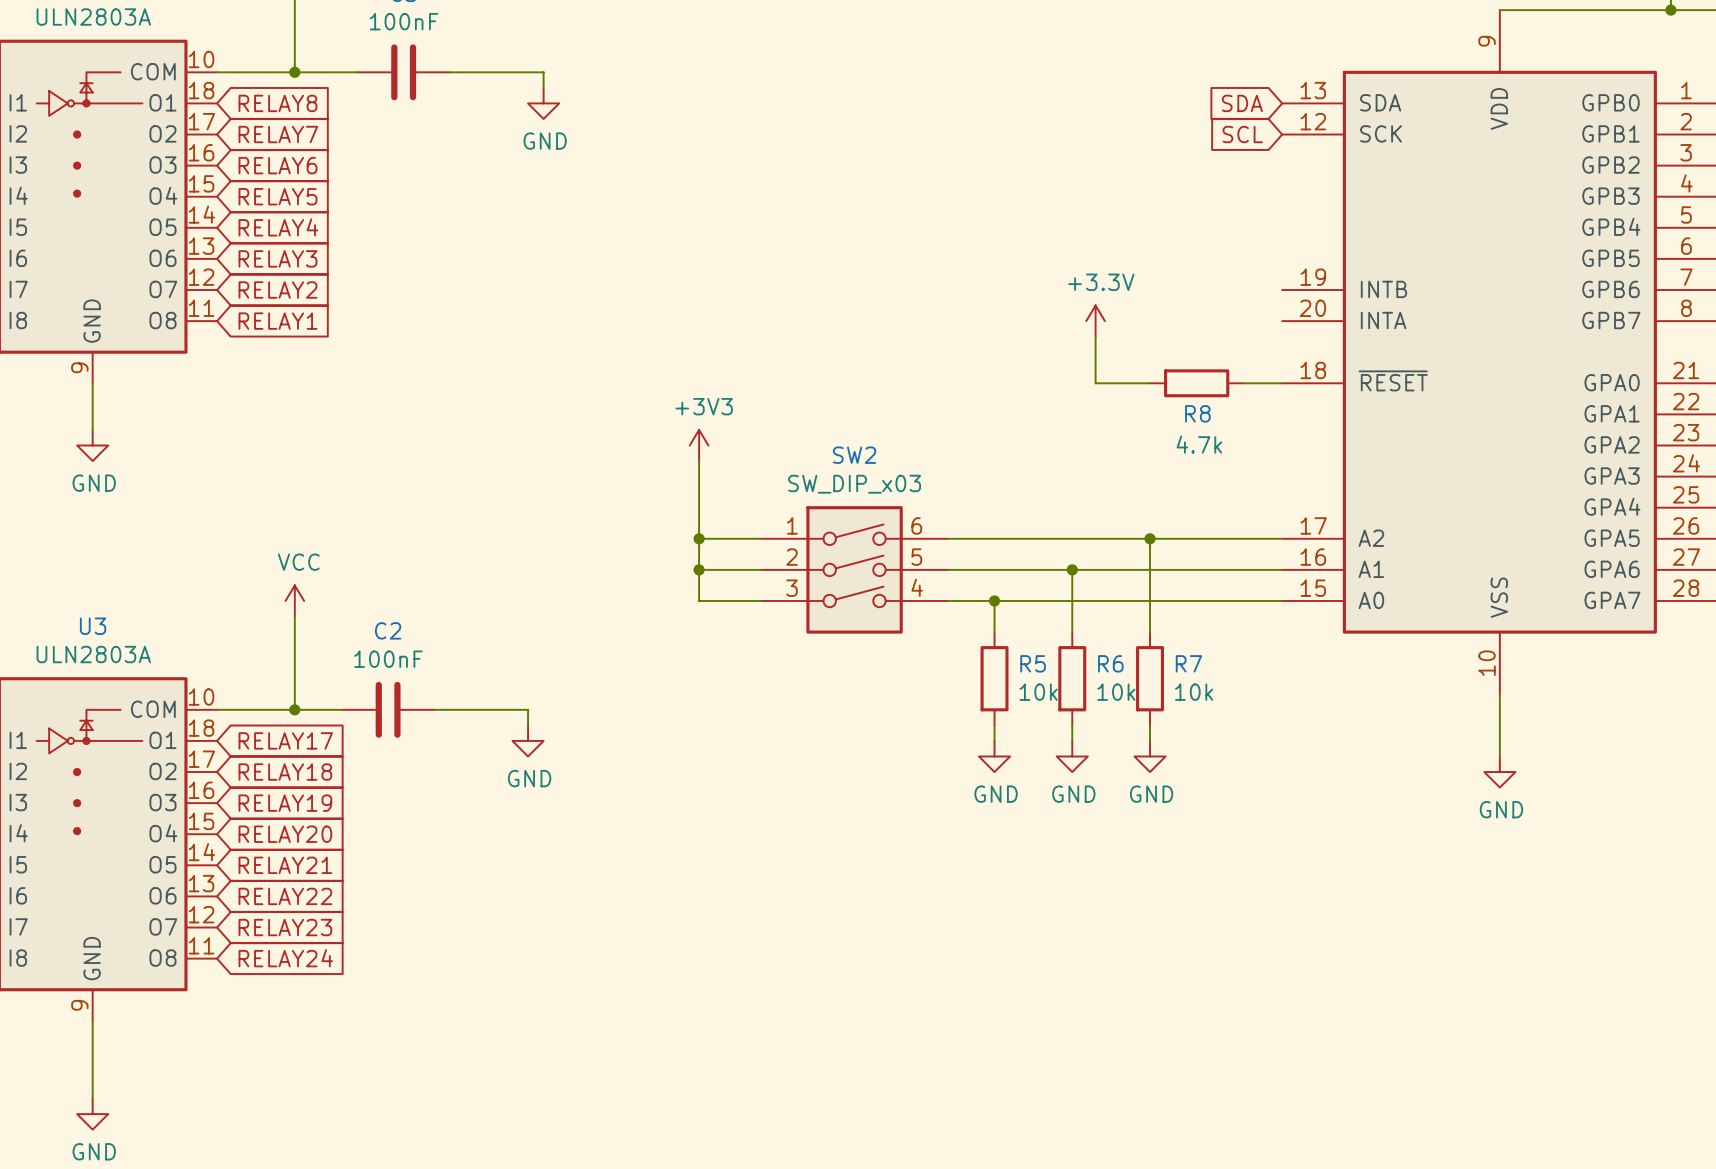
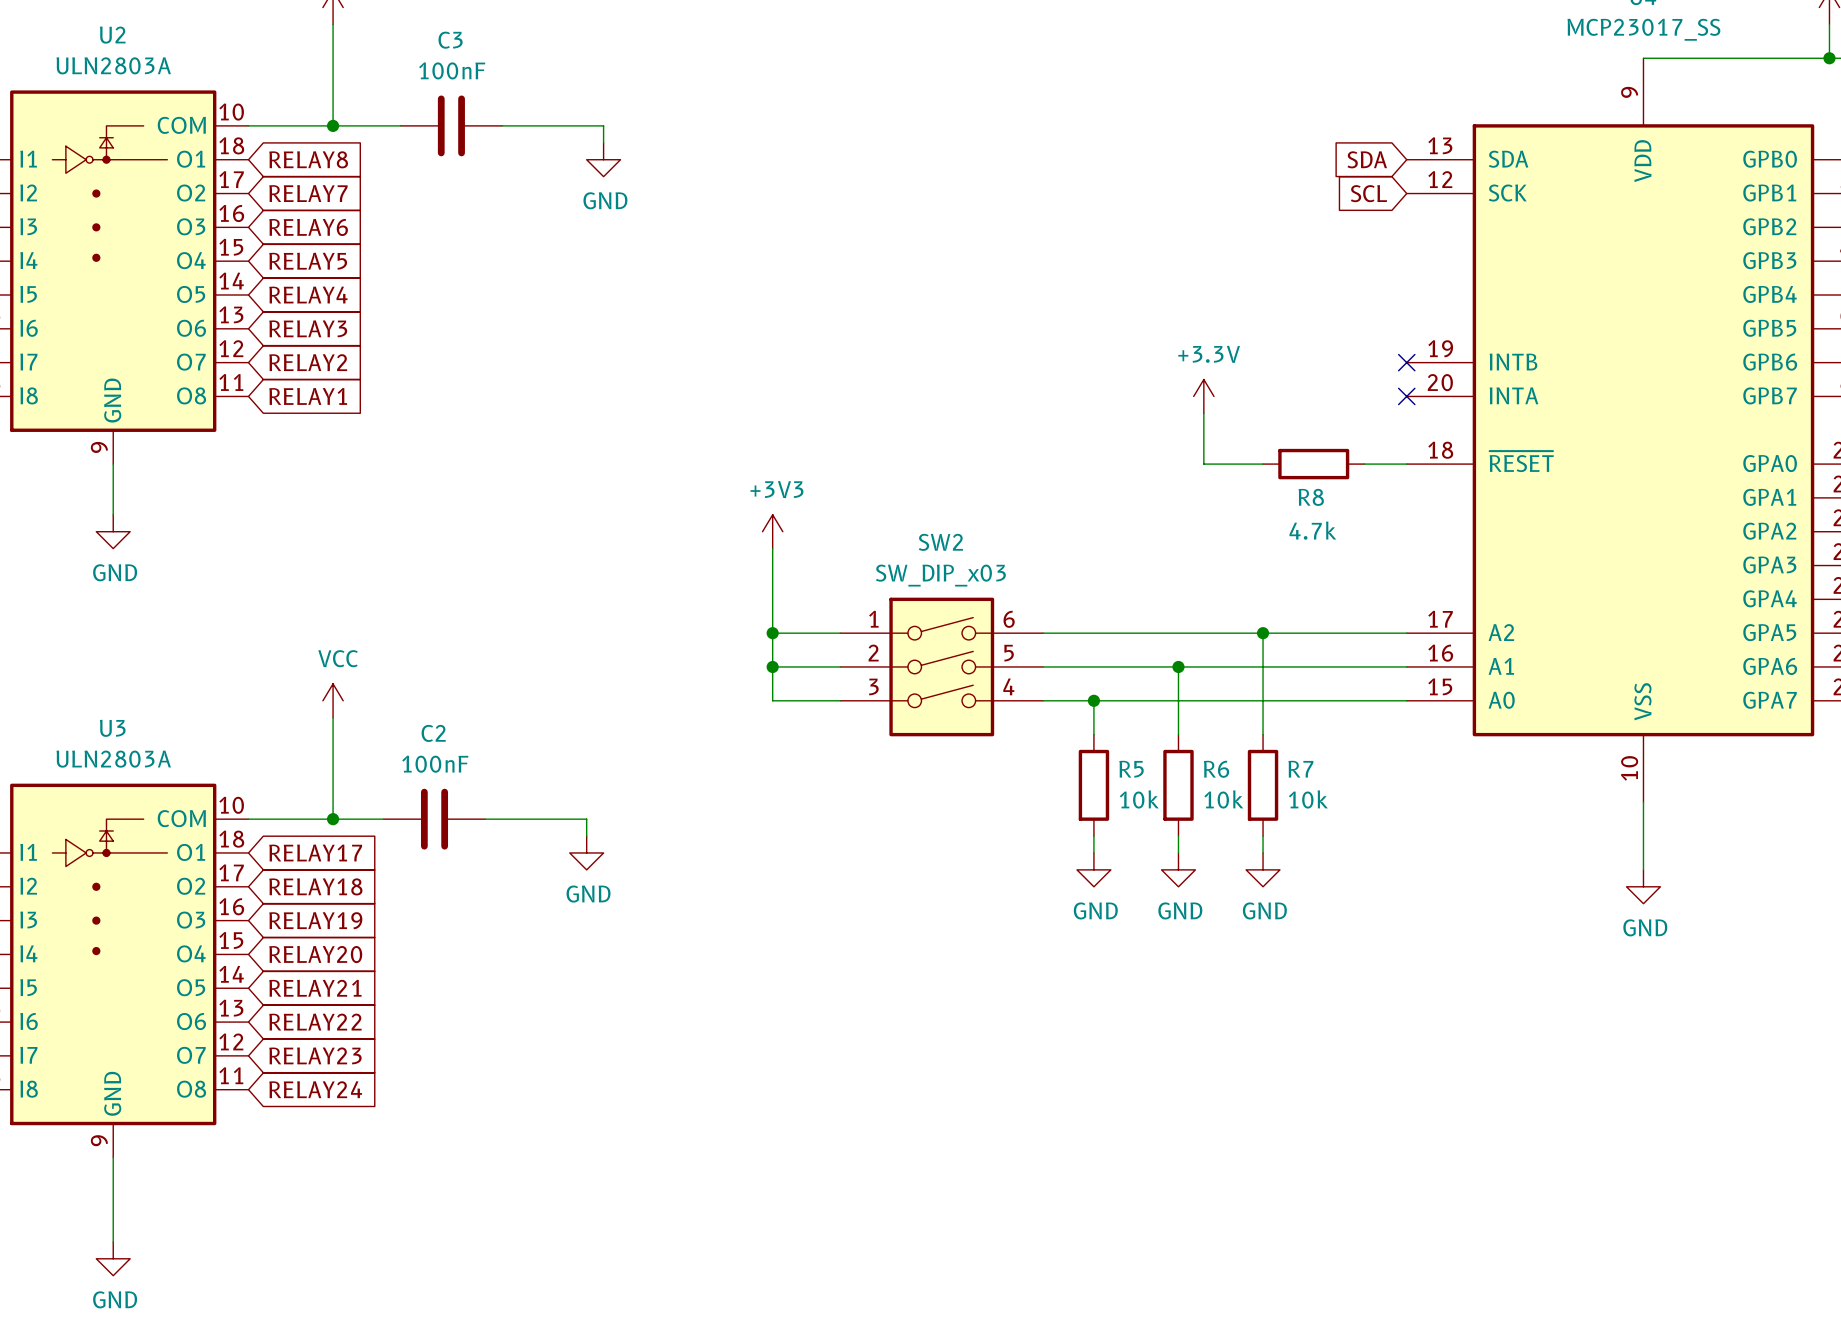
no-connect mark: none -> (1406, 362)
no-connect mark: none -> (1406, 396)

